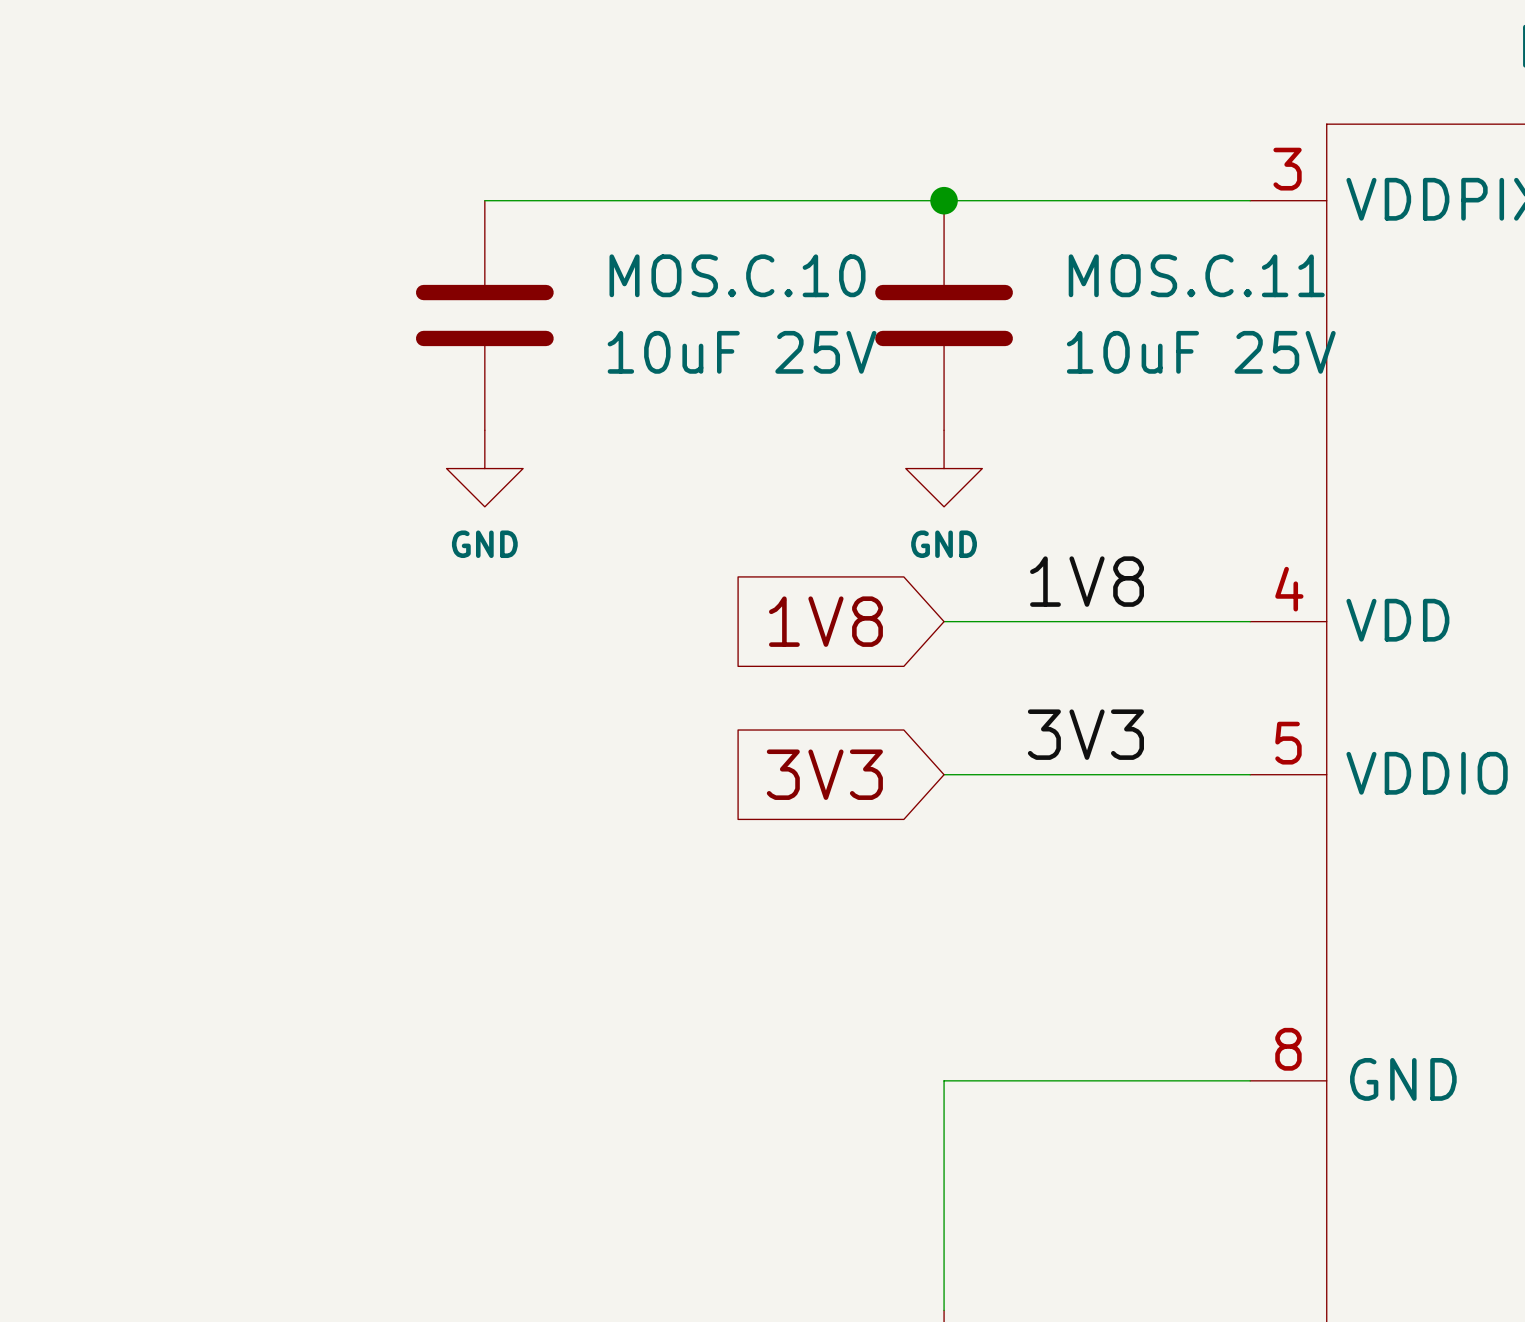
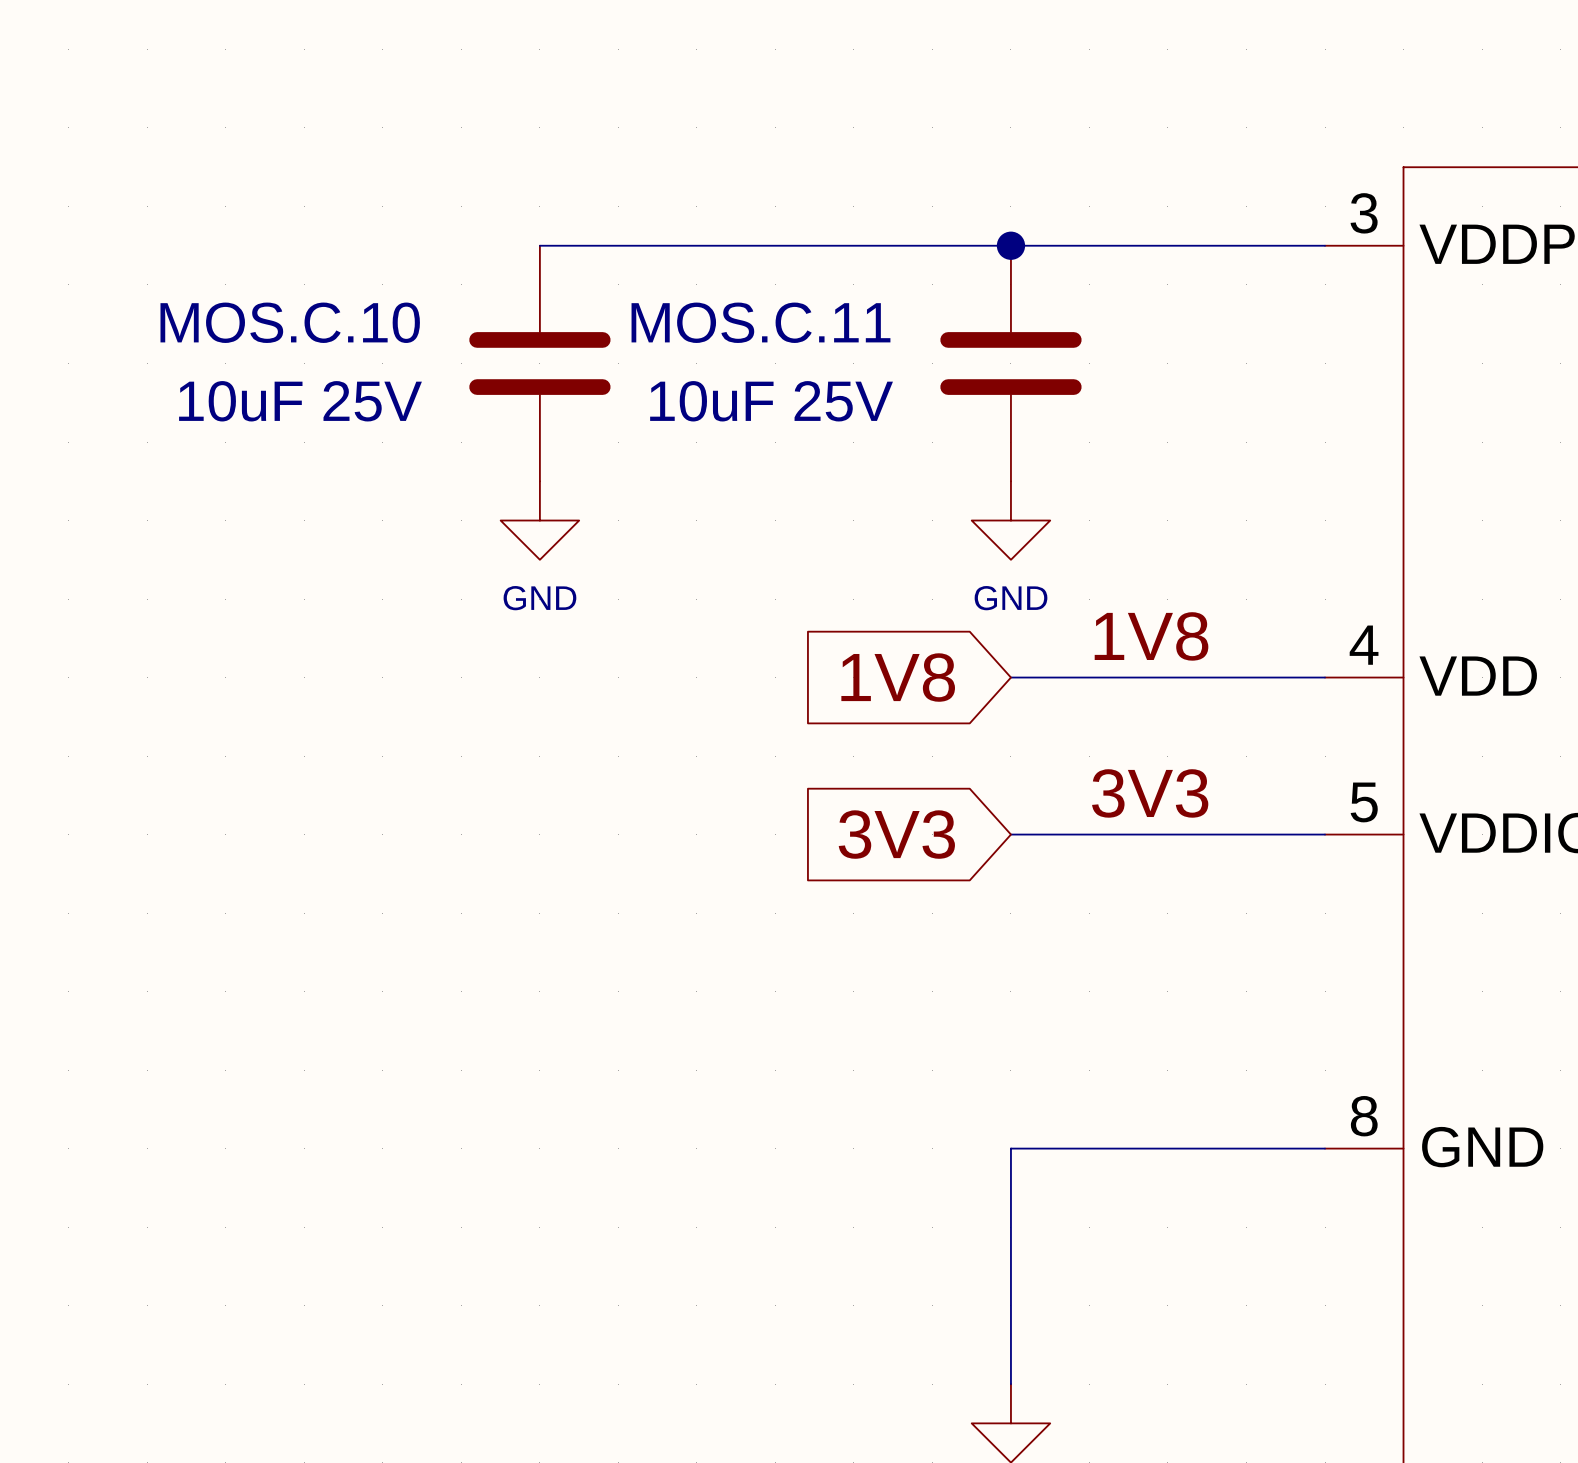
MOS.C.10 name position: MOS.C.10 (737, 275) -> MOS.C.10 (290, 322)
MOS.C.11 name position: MOS.C.11 (1196, 275) -> MOS.C.11 (760, 322)
MOS.C.10 value position: 10uF 25V (742, 352) -> 10uF 25V (300, 401)
MOS.C.11 value position: 10uF 25V (1201, 352) -> 10uF 25V (771, 401)

